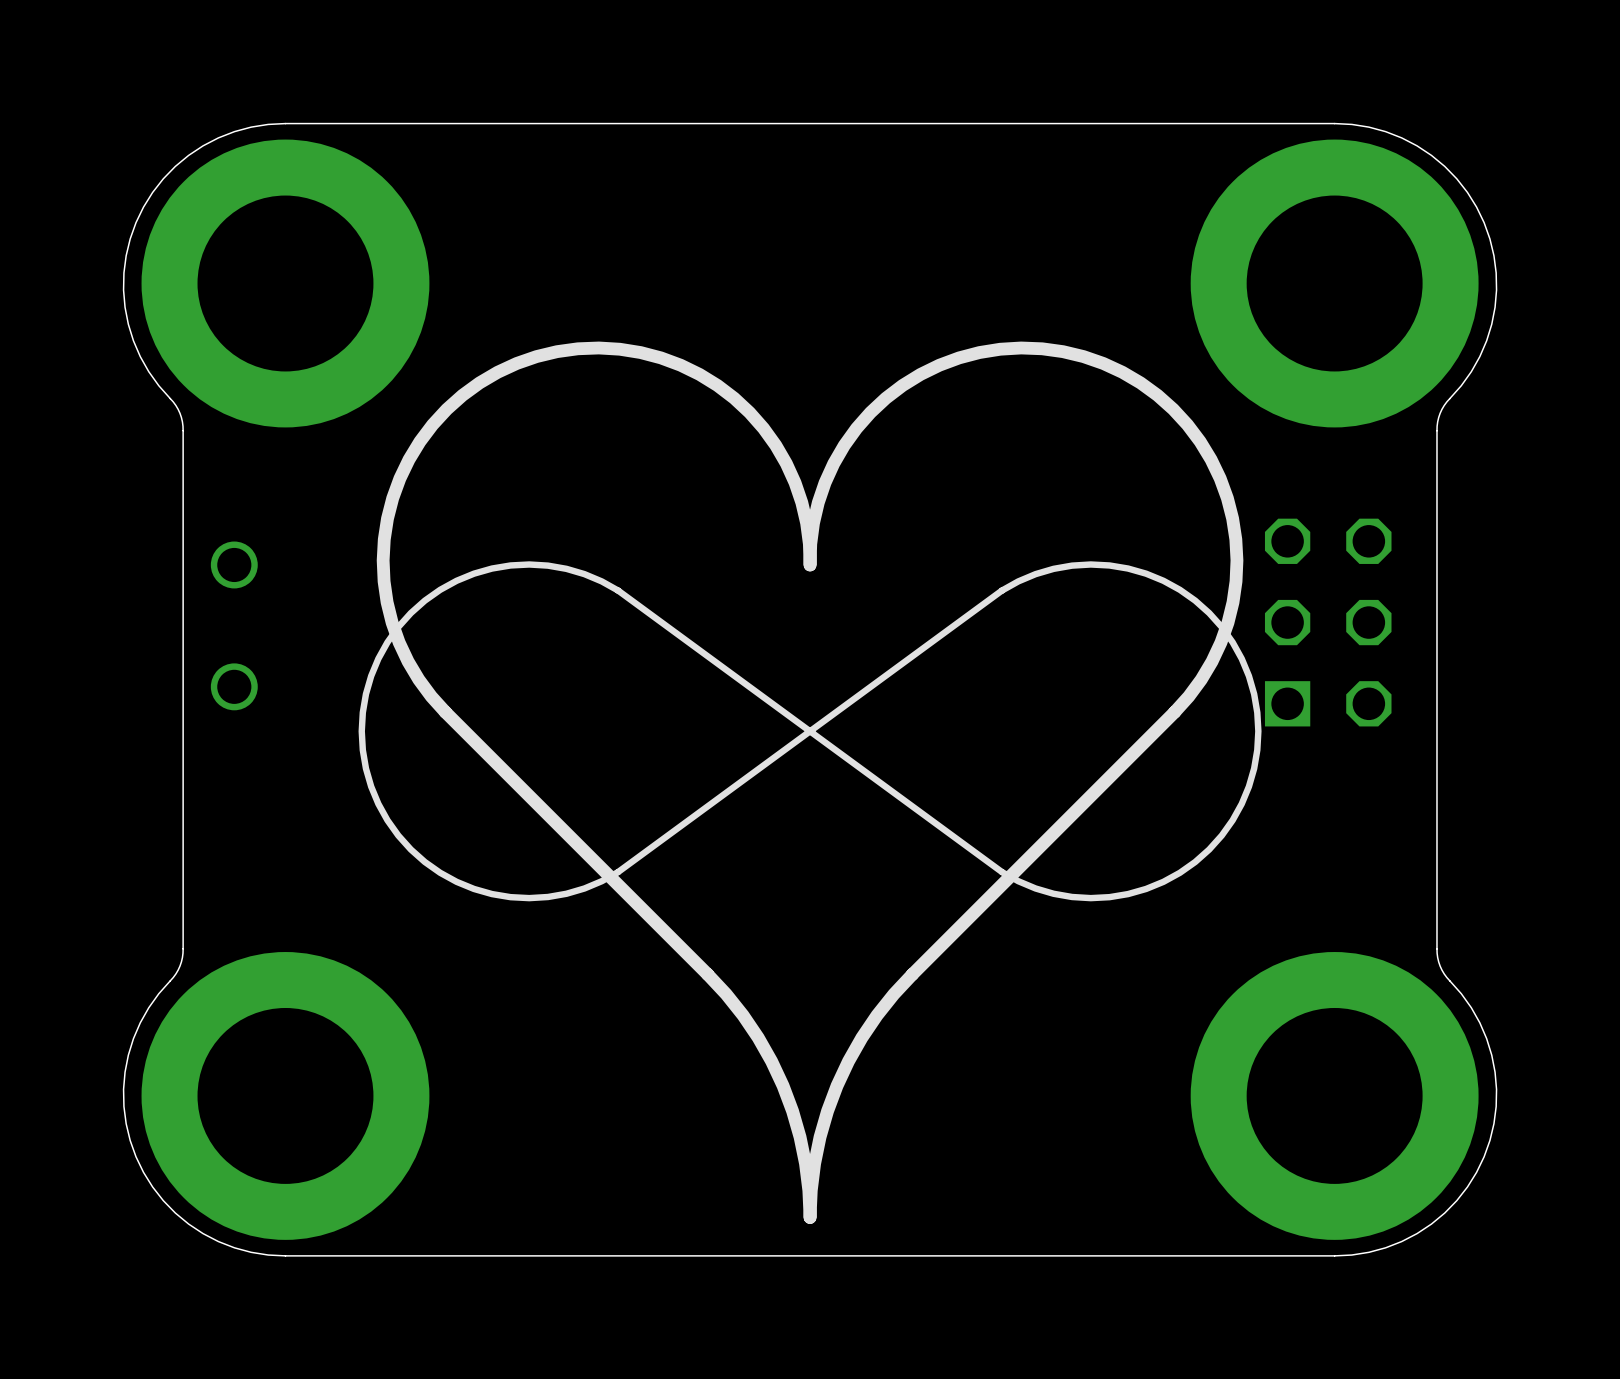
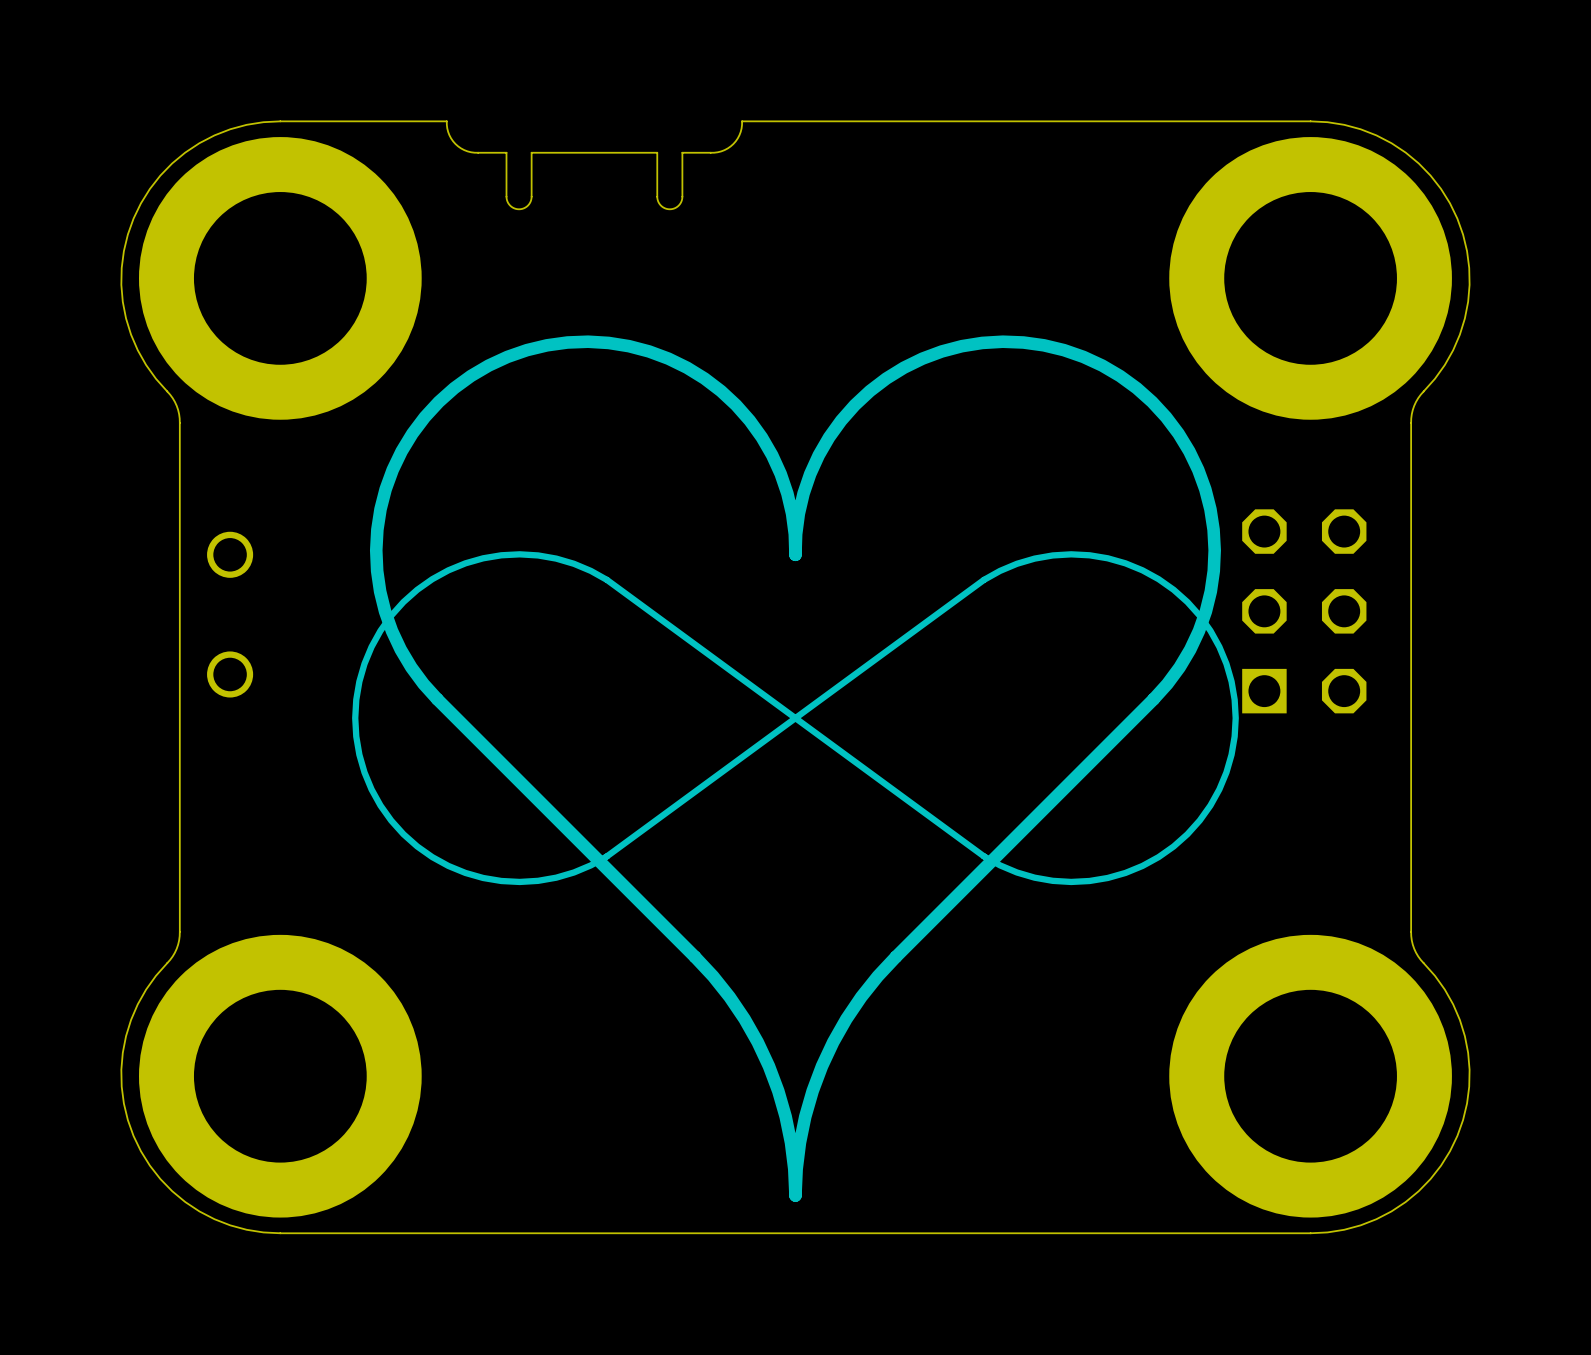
board edge: (755, 123) (455, 123) -> (742, 121) (737, 138) (724, 150) (714, 152) (682, 152) (681, 199) (677, 206) (669, 209) (662, 206) (657, 199) (657, 152) (531, 152) (531, 199) (523, 208) (514, 208) (509, 204) (506, 198) (506, 152) (474, 152) (464, 150) (451, 138) (446, 121)

